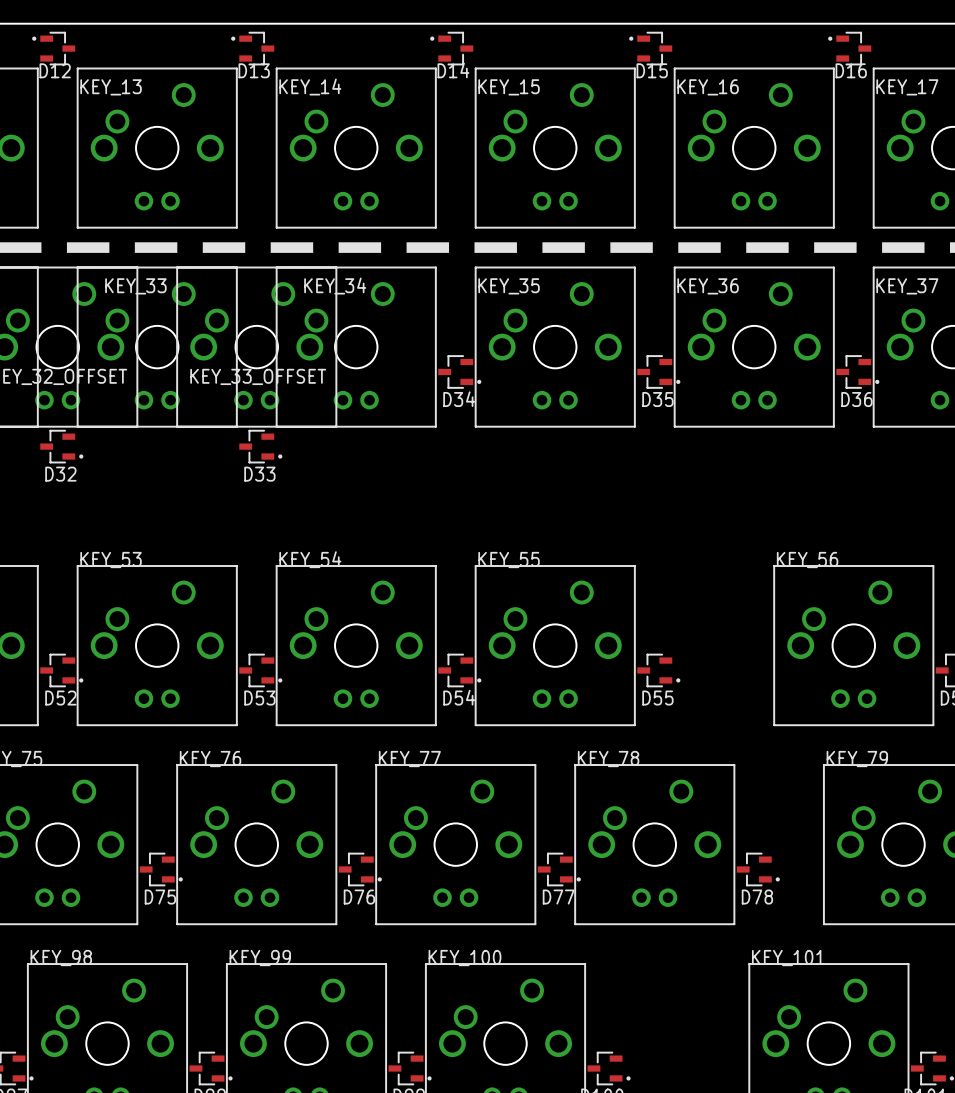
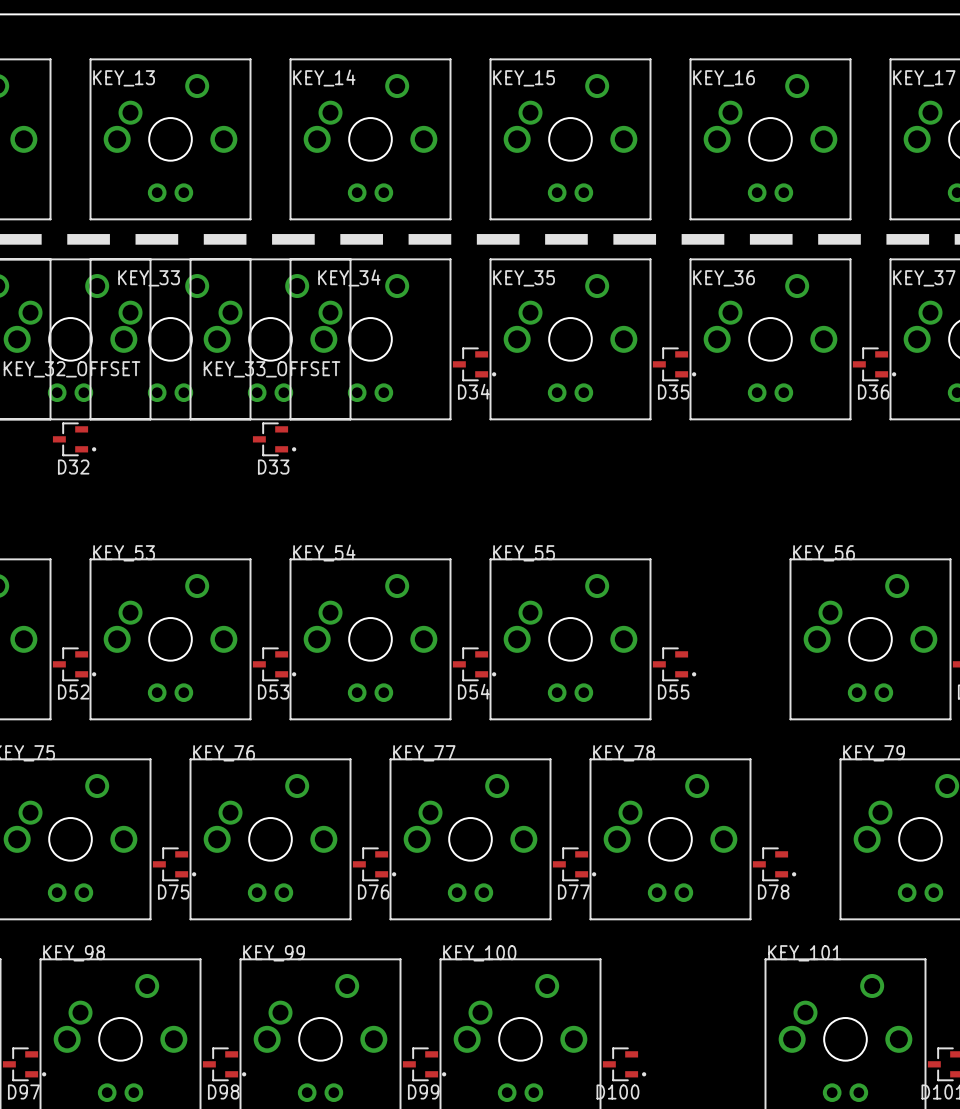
D12: (53, 48) -> none
D13: (252, 48) -> none
D14: (451, 48) -> none
D15: (650, 48) -> none
D16: (849, 48) -> none

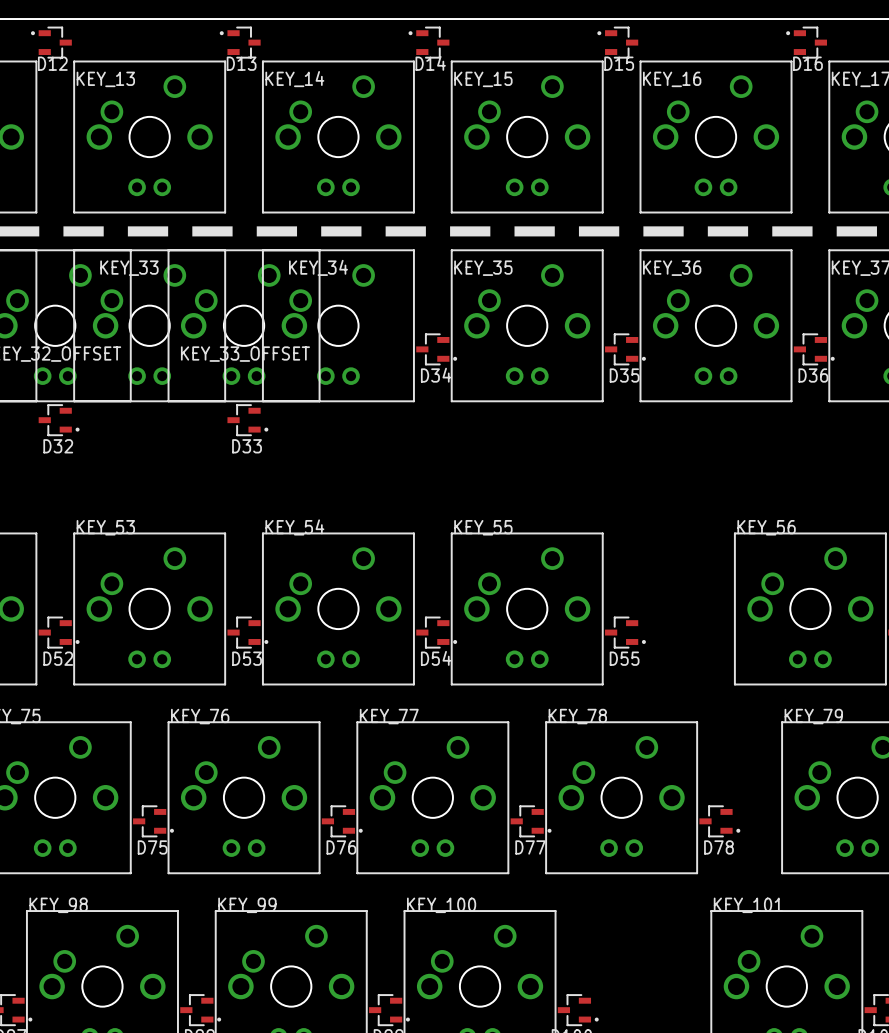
D12: none -> (51, 42)
D13: none -> (240, 42)
D14: none -> (428, 42)
D15: none -> (617, 42)
D16: none -> (806, 42)

